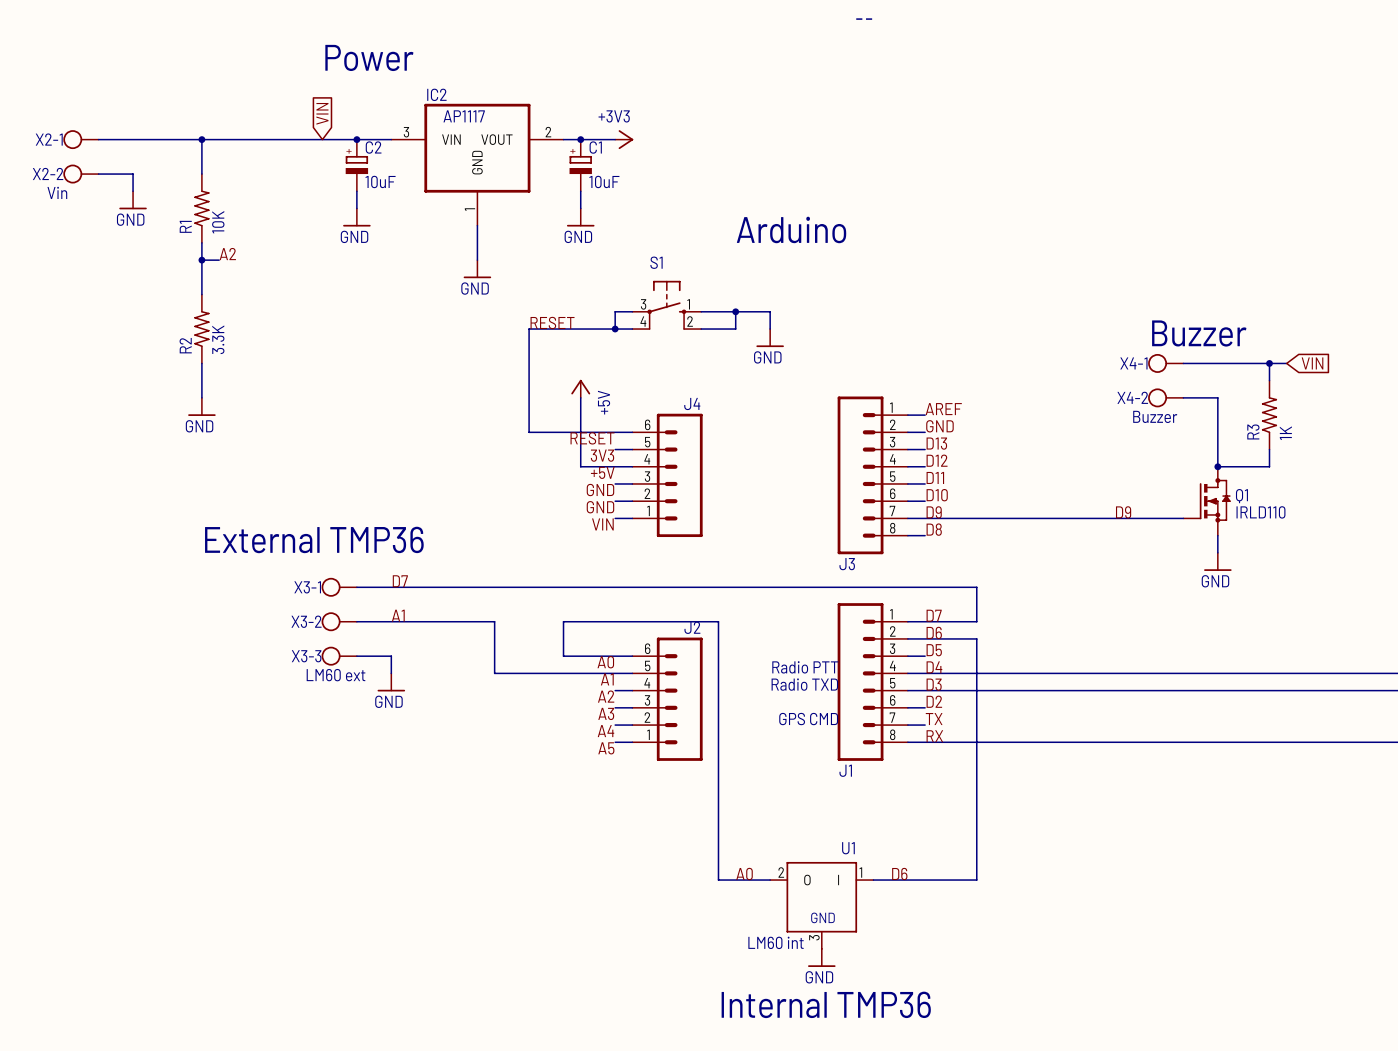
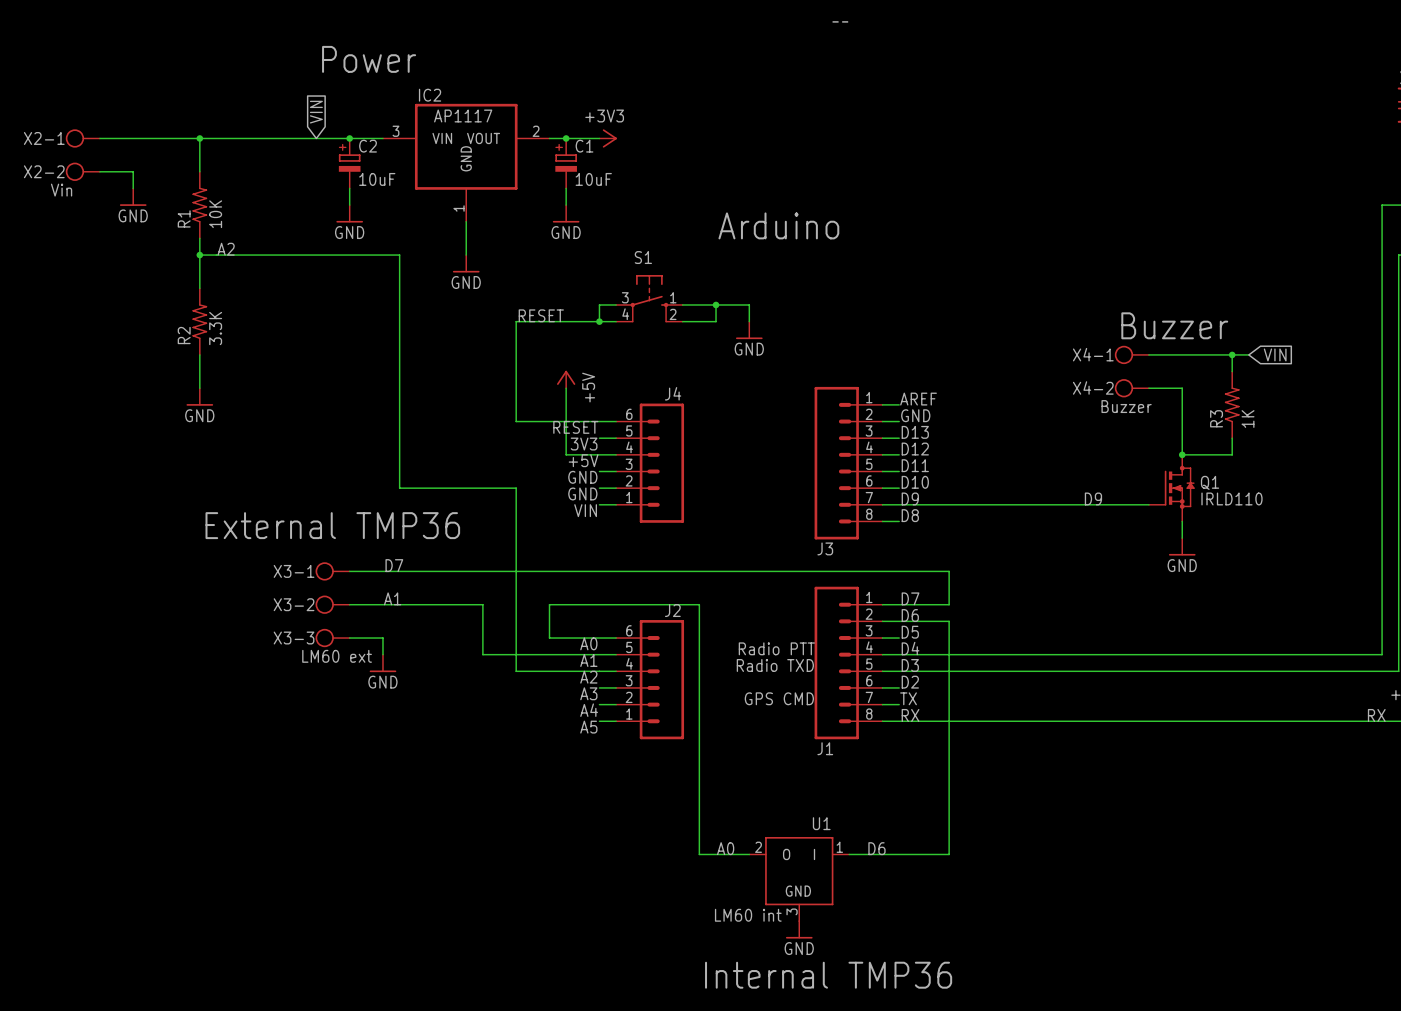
wire: none -> (216, 255) (399, 255) (399, 488) (516, 488) (516, 671) (599, 671)

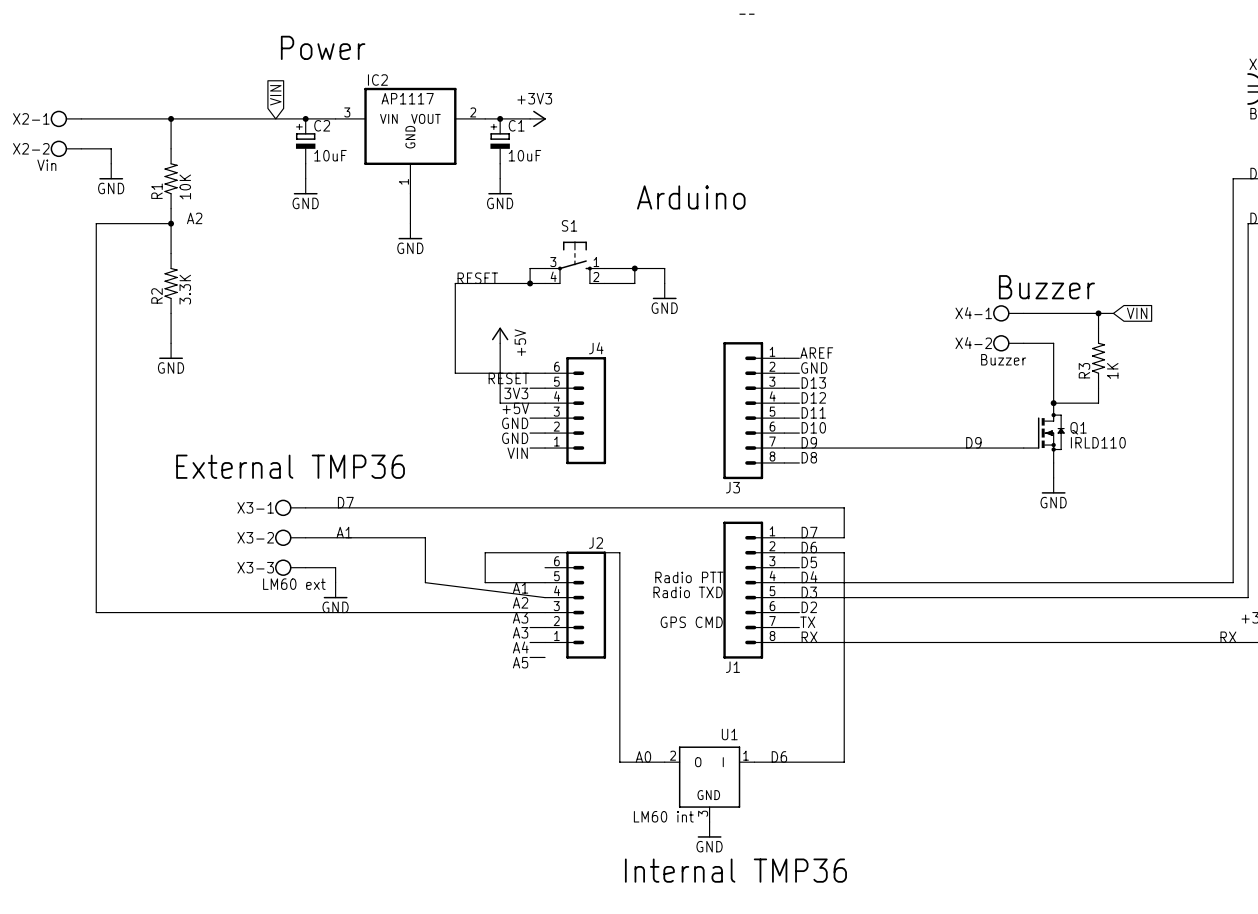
wire: (199, 255) (399, 255) (399, 488) (516, 488) (516, 671) (616, 671) -> (171, 223) (96, 223) (96, 612) (530, 612)
wire: (549, 621) (549, 604) (699, 604) (699, 621) -> (485, 552) (619, 552)
wire: (549, 638) (616, 638) -> none
label: A0 (588, 643) -> none
wire: (482, 654) (549, 654) -> (485, 567) (485, 582)
wire: none -> (425, 582) (545, 597)
label: A4 (589, 710) -> A3 (520, 632)
label: A5 (588, 727) -> A4 (520, 647)
wire: none -> (530, 657) (545, 657)
label: none -> A5 (520, 662)

